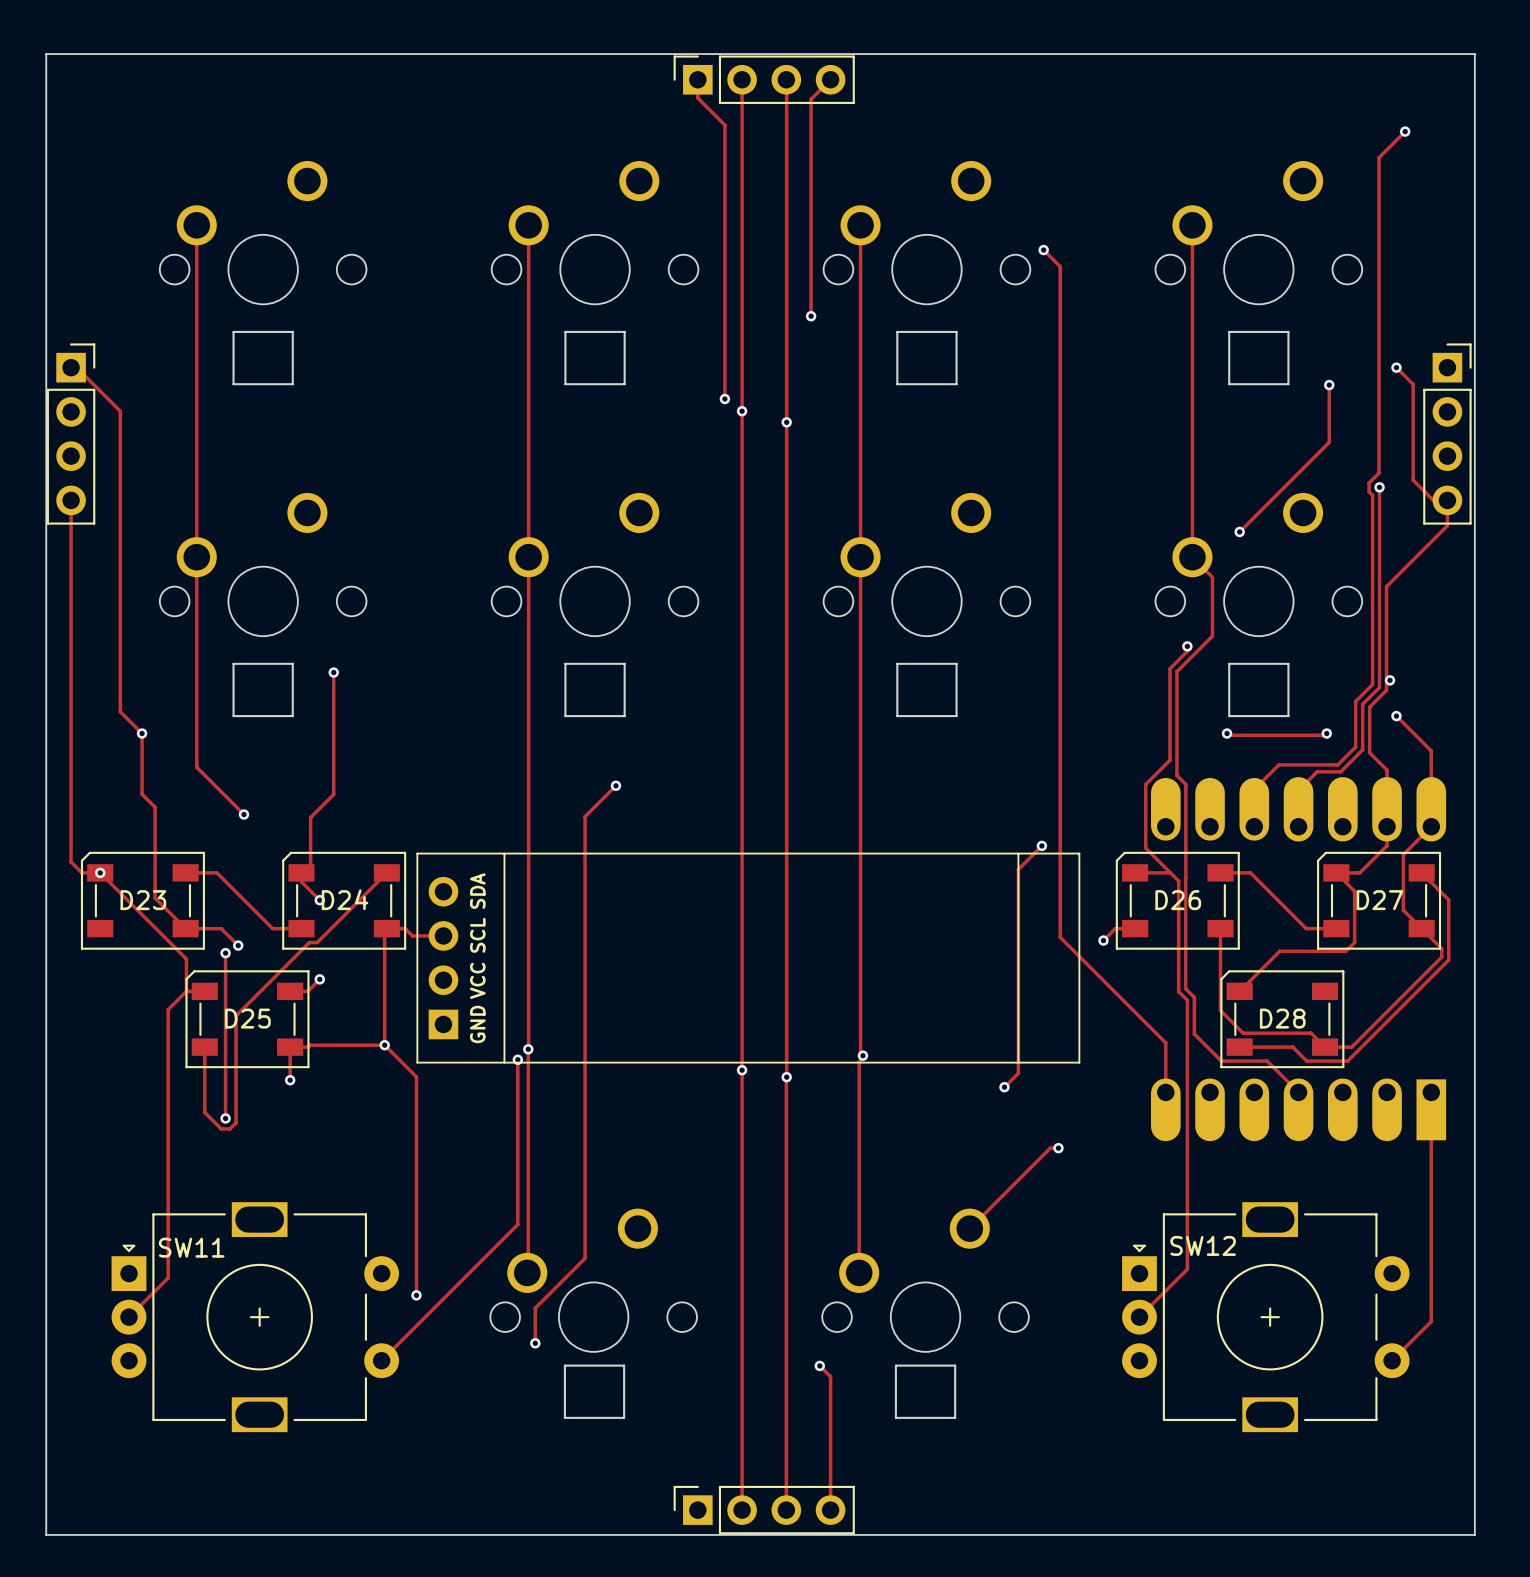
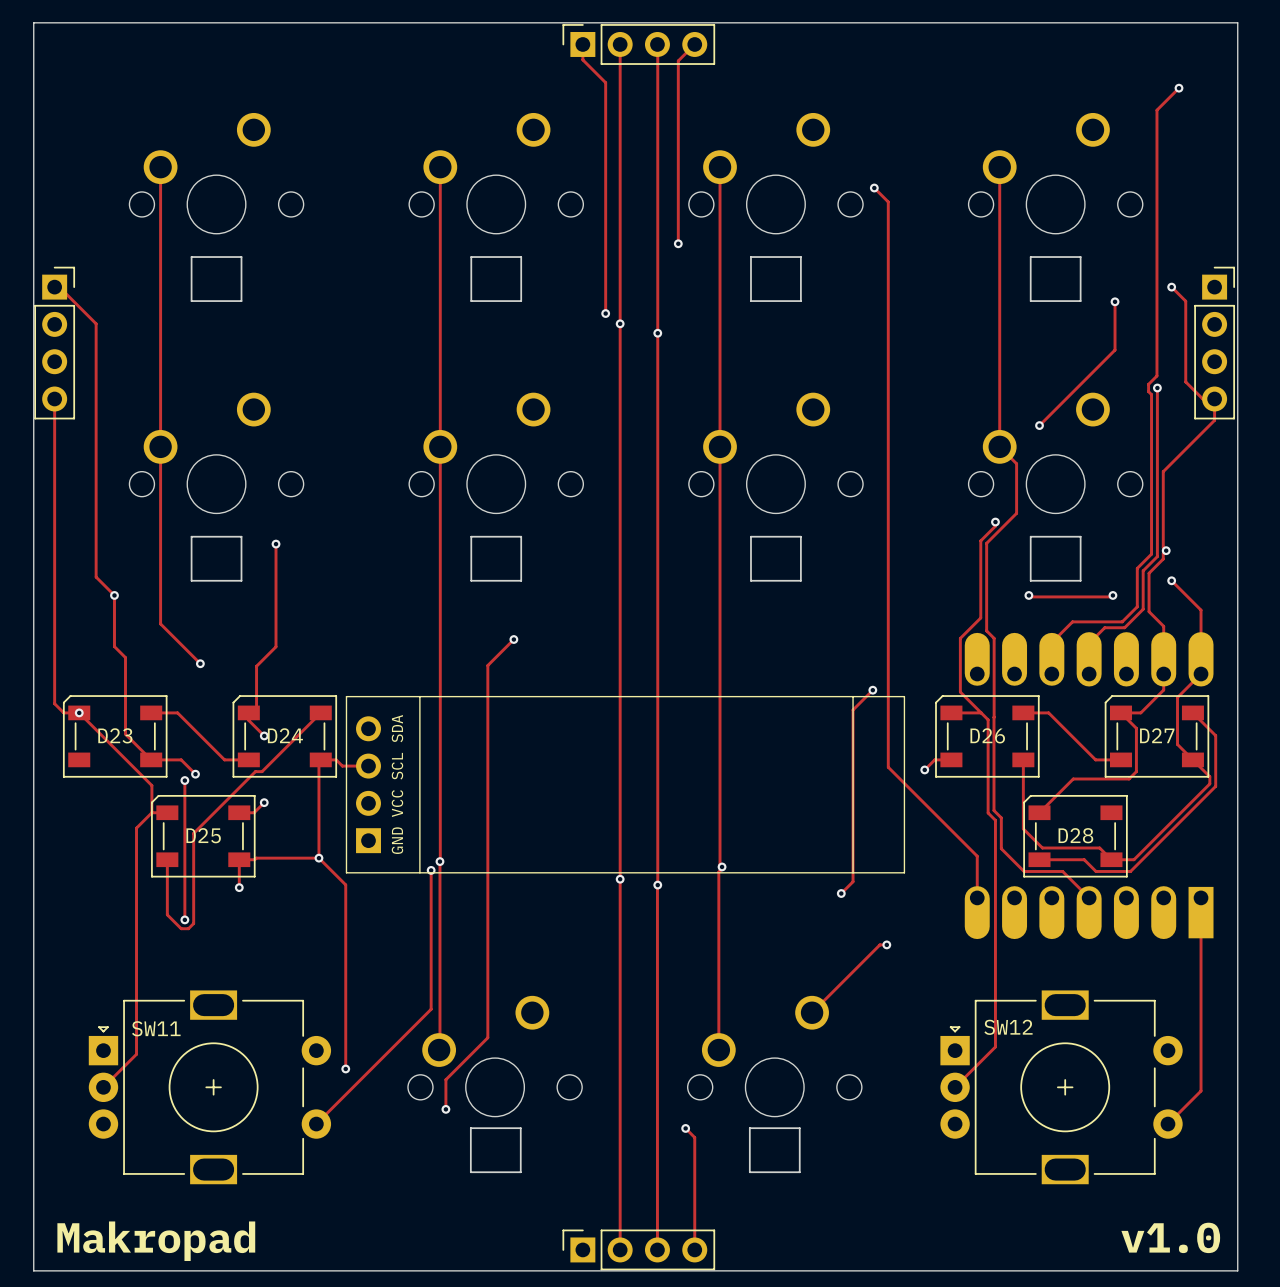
text: none -> v1.0 (1170, 1237)
text: none -> Makropad (156, 1241)

